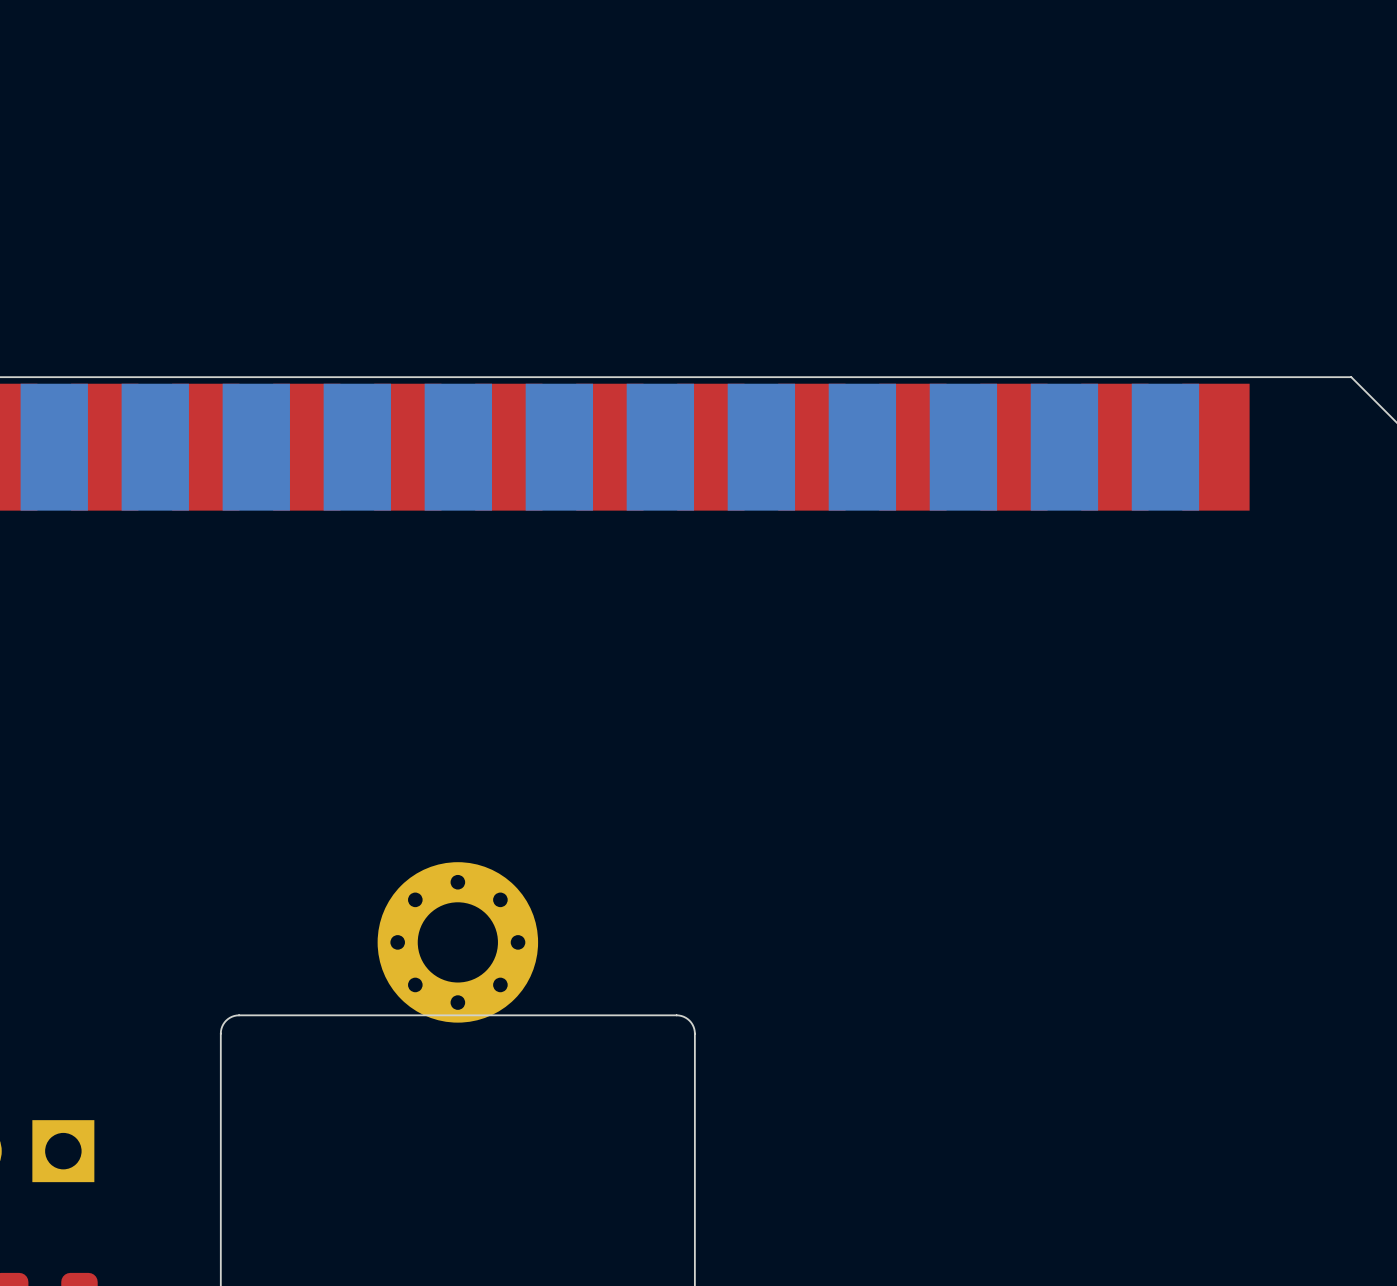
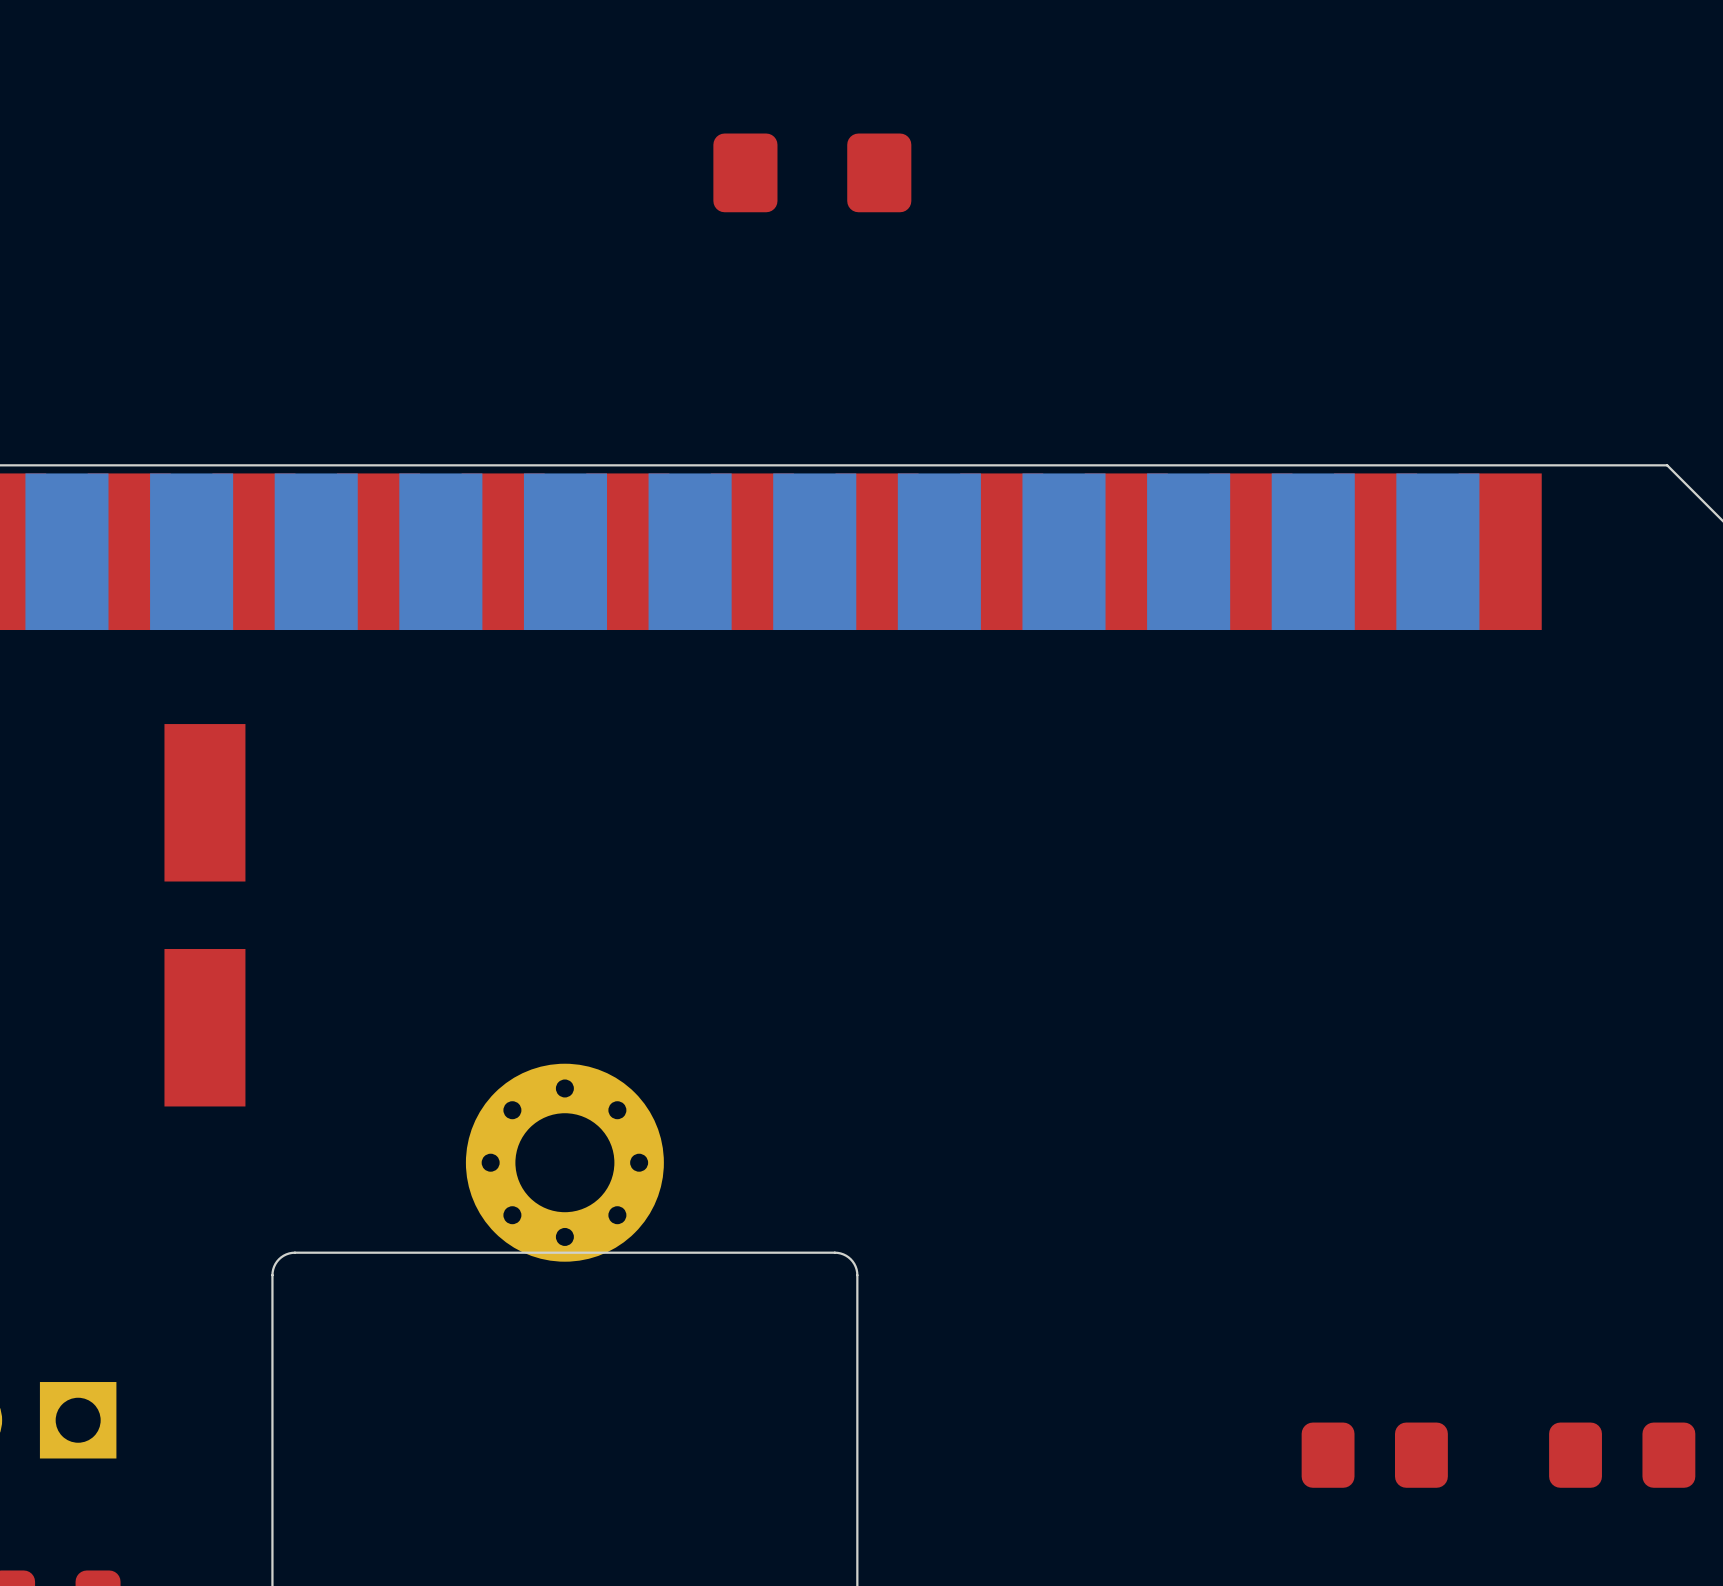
part: none -> (812, 172)
part: none -> (204, 915)
part: none -> (1374, 1455)
part: none -> (1622, 1455)

